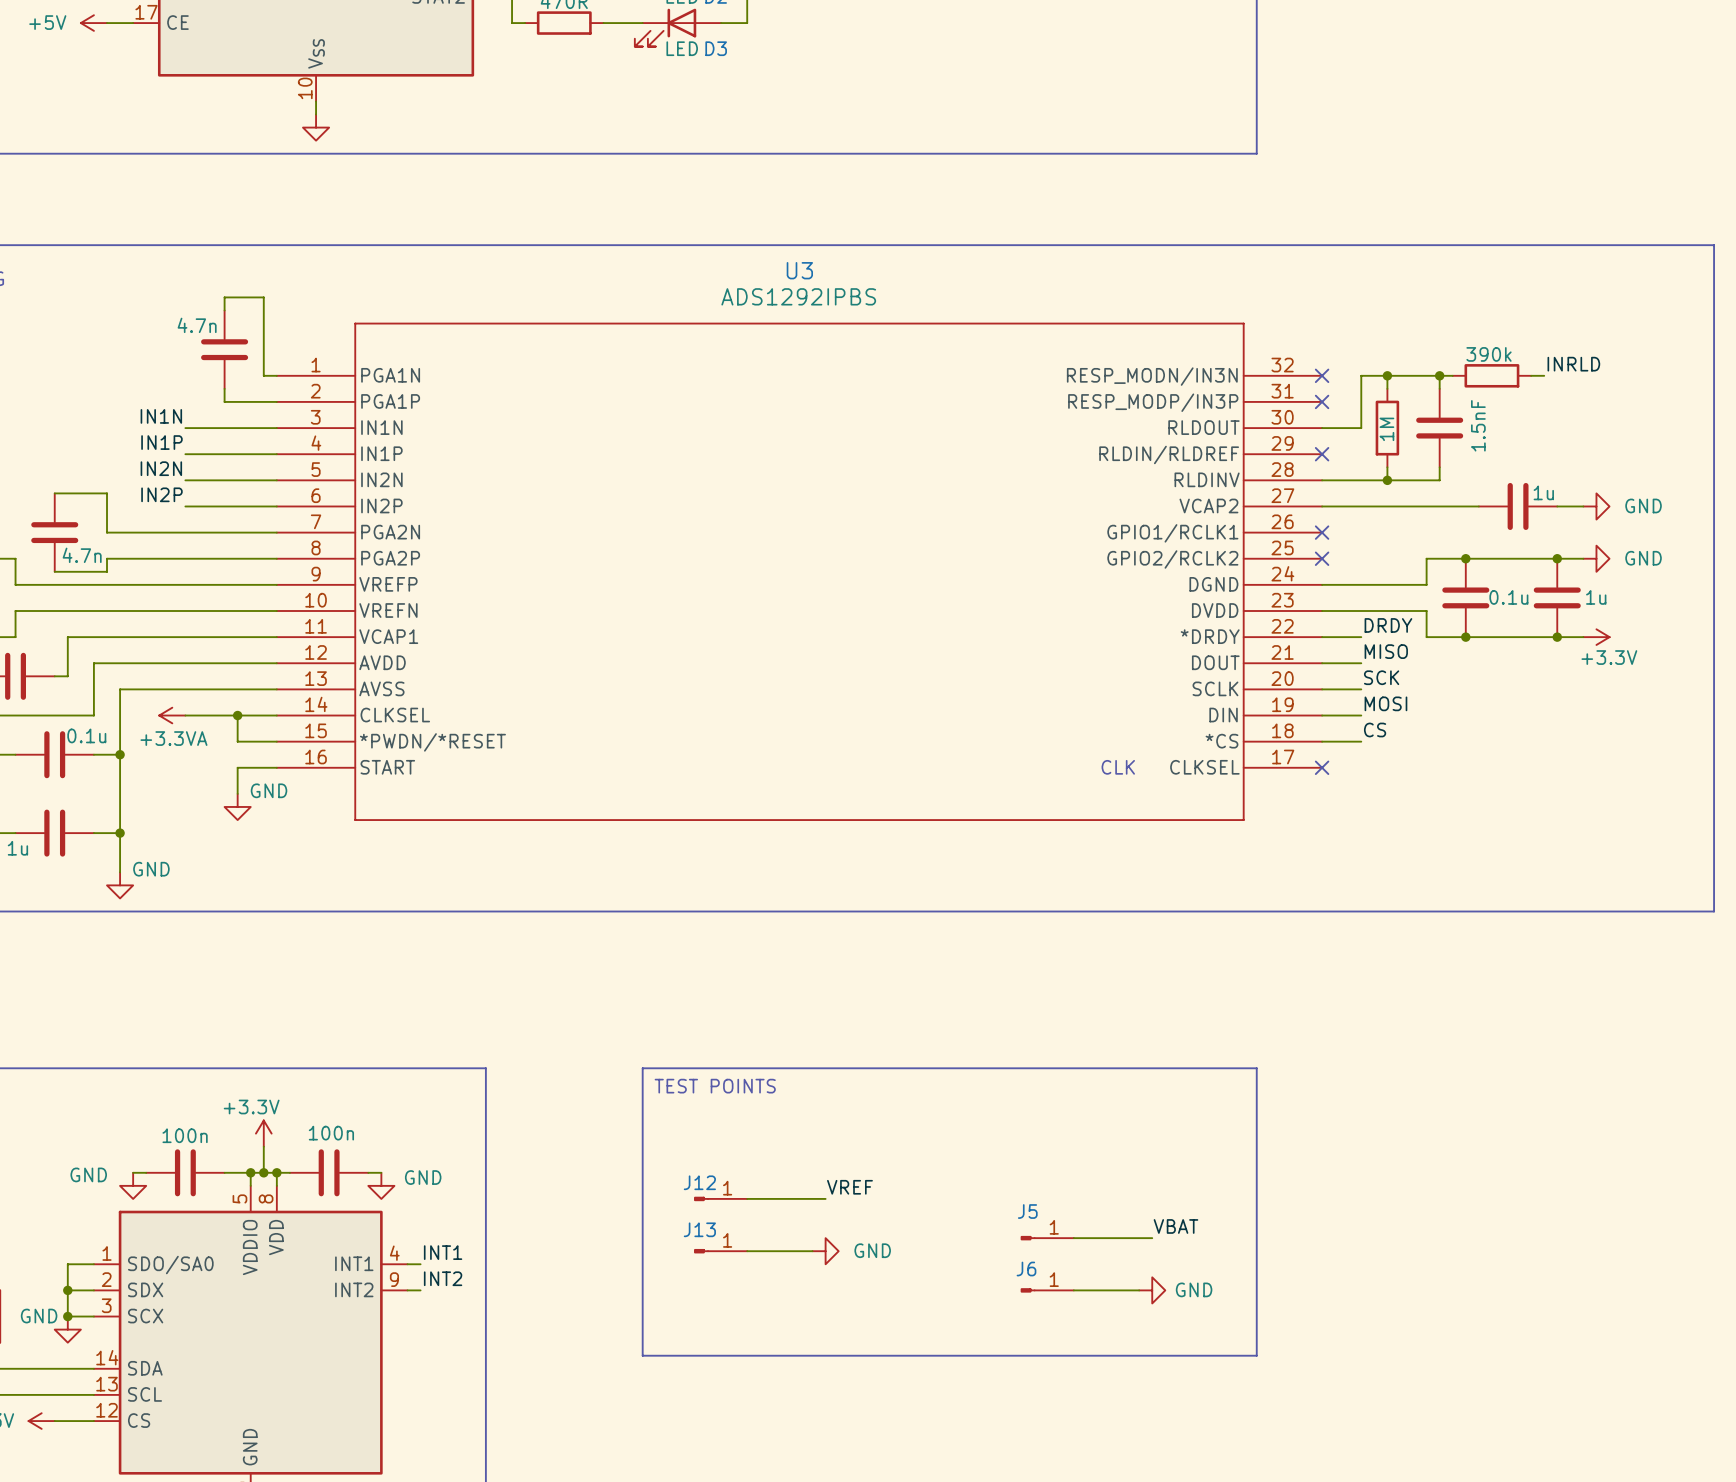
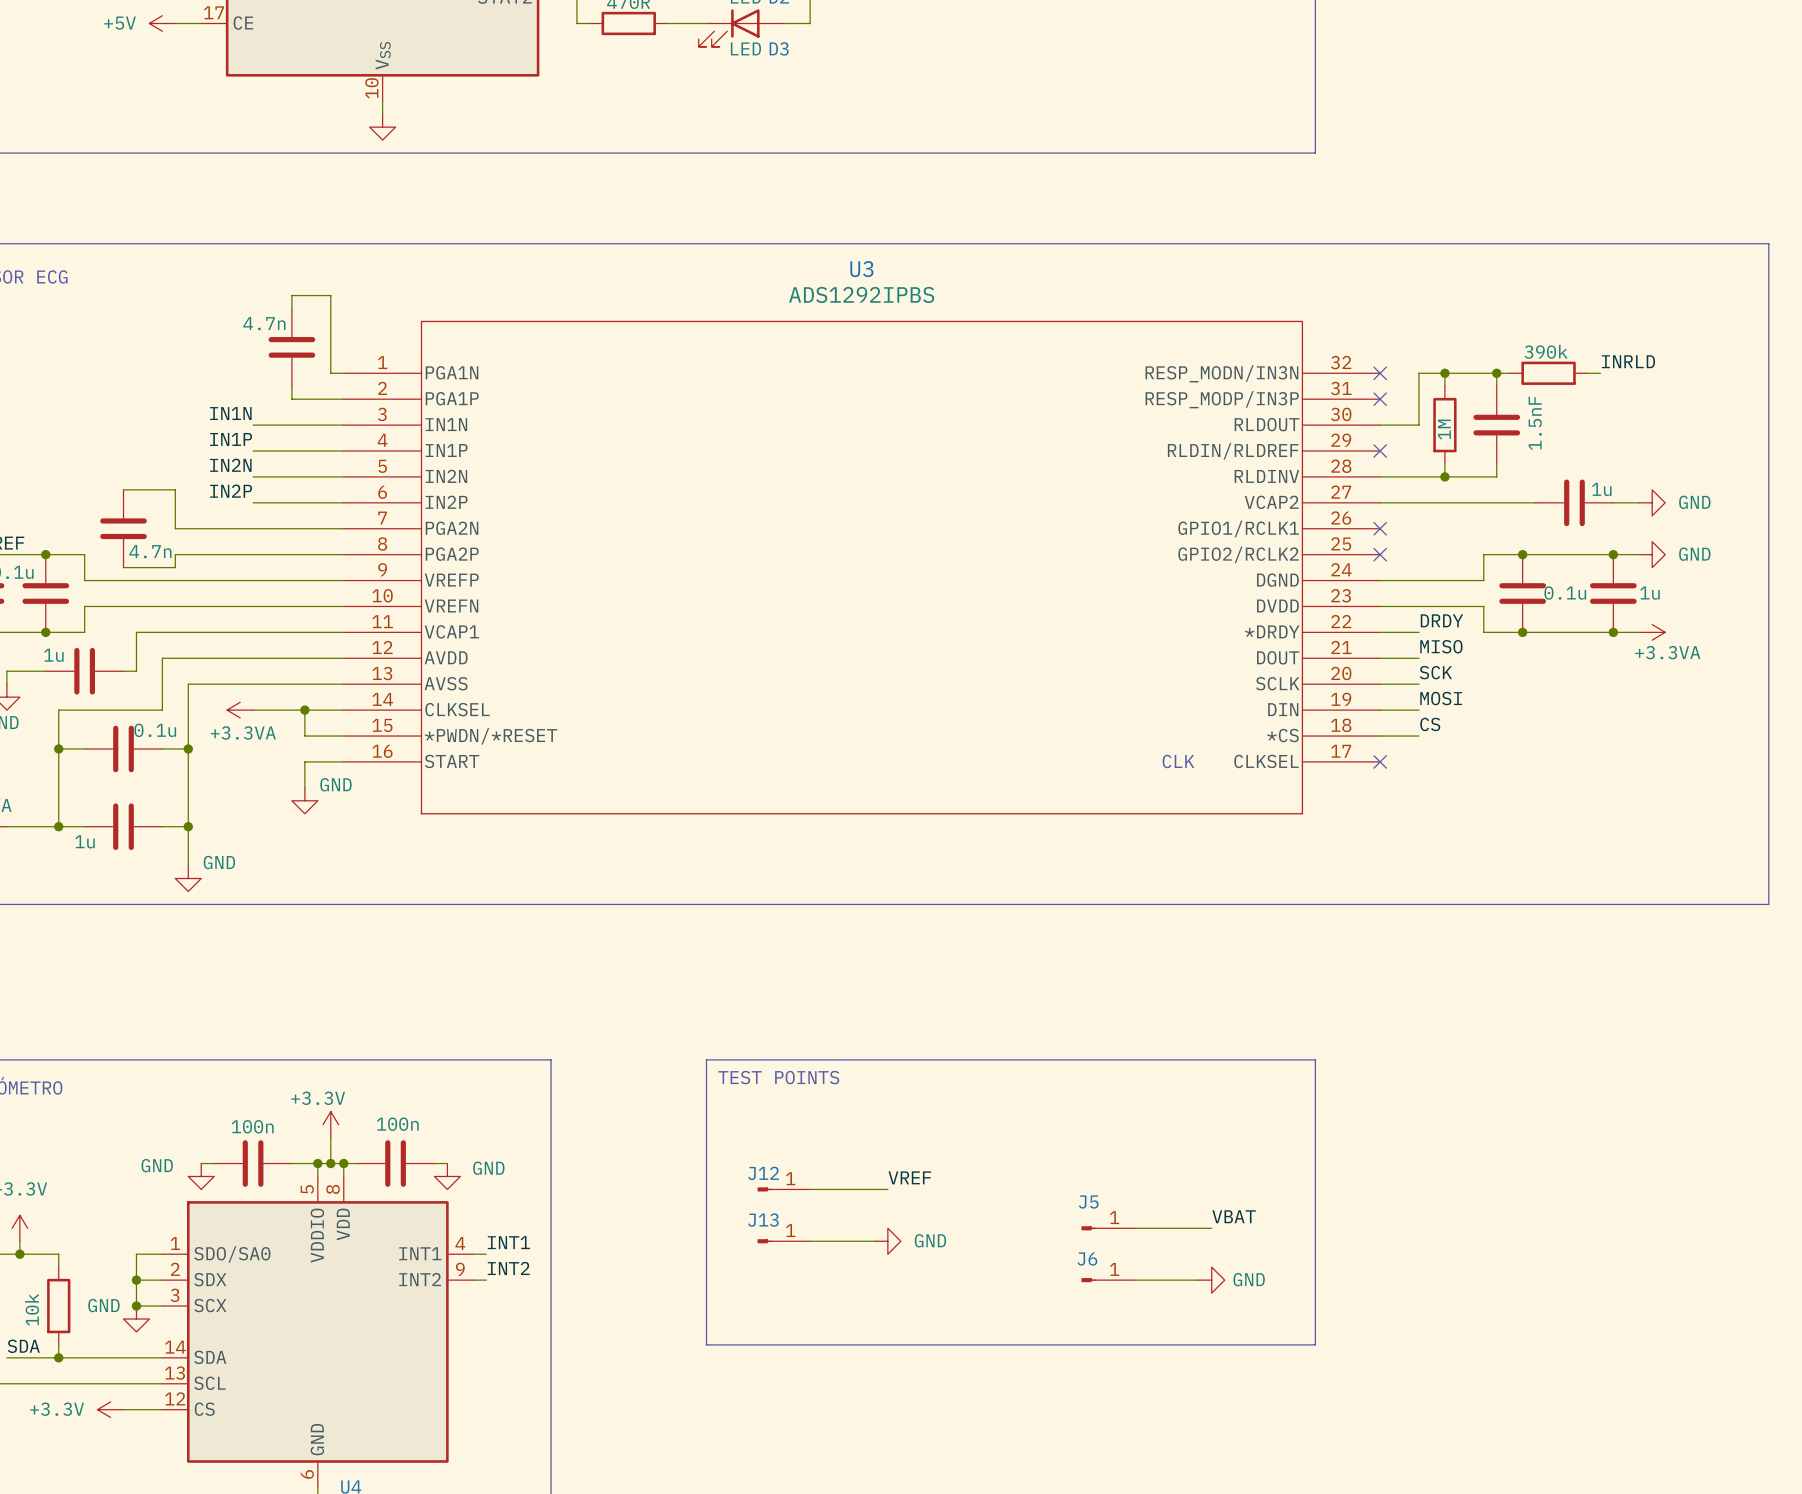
power symbol: +3.3V (1596, 637) -> +3.3VA (1652, 632)

